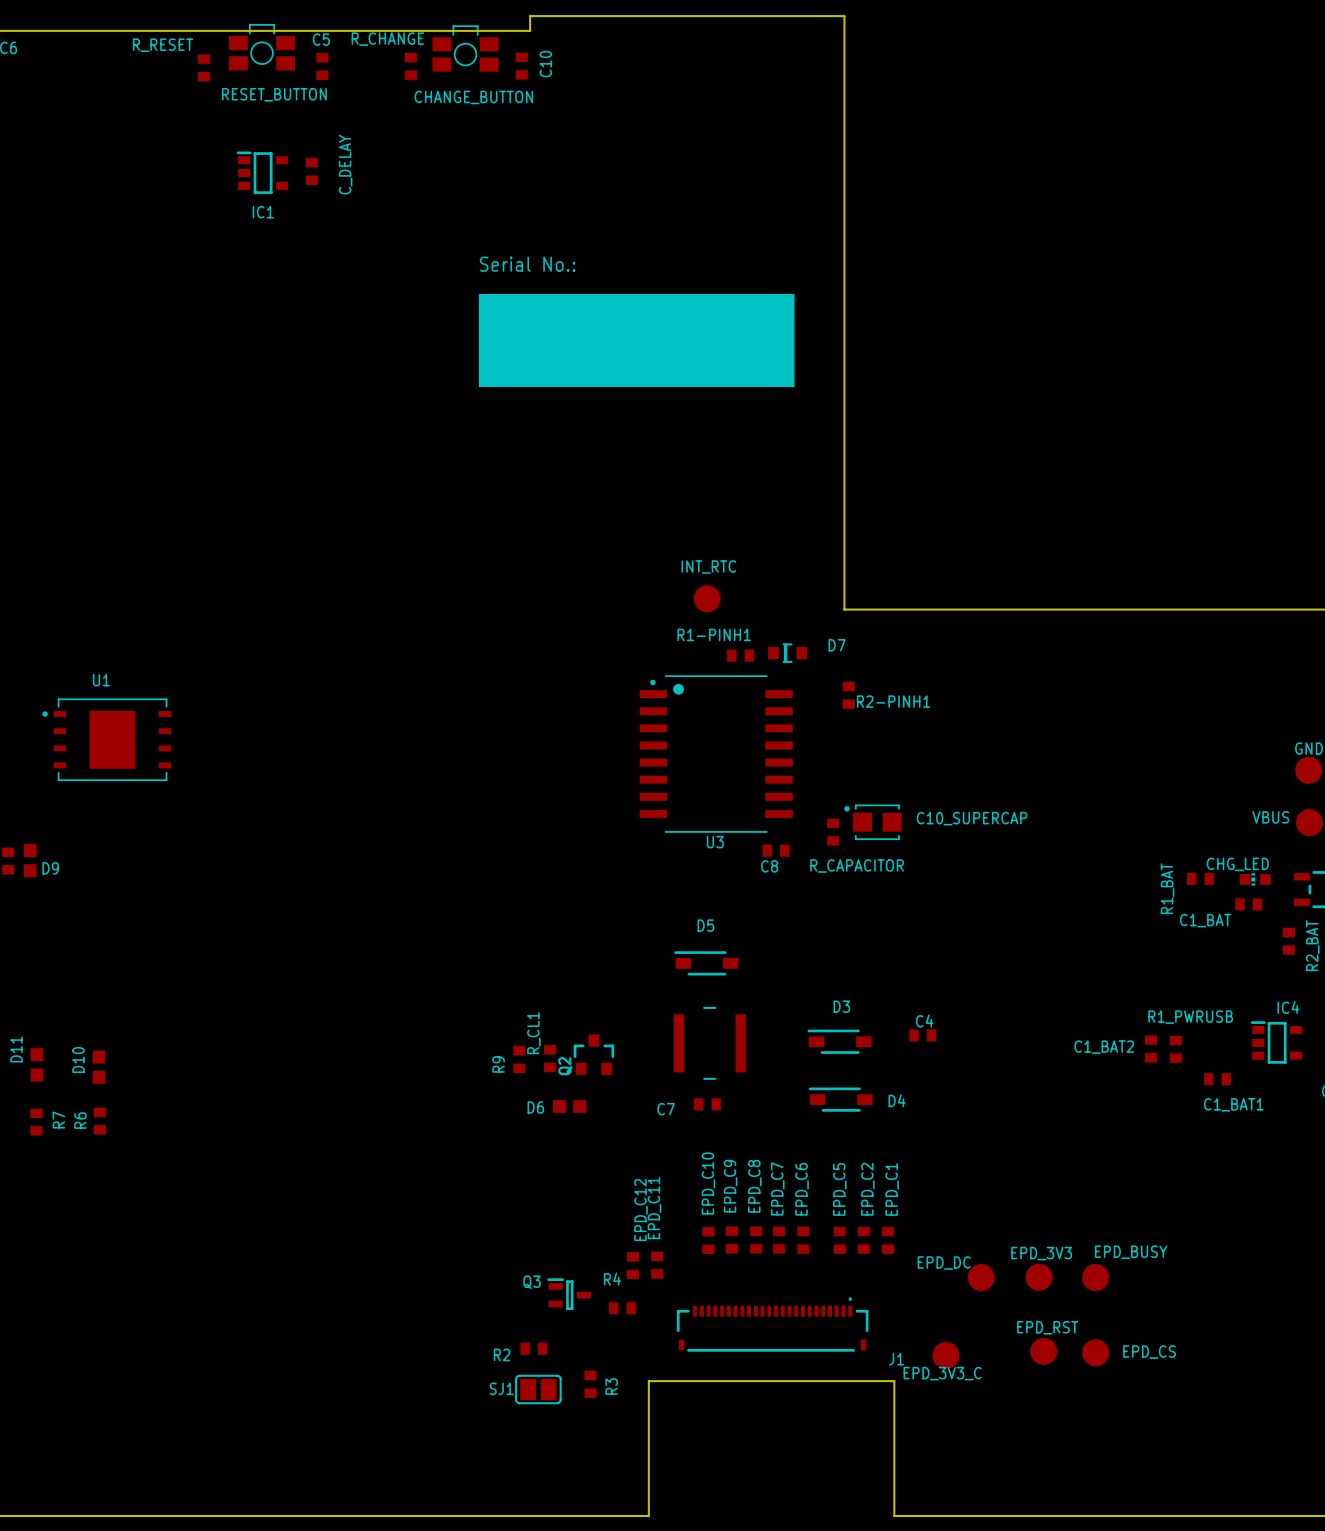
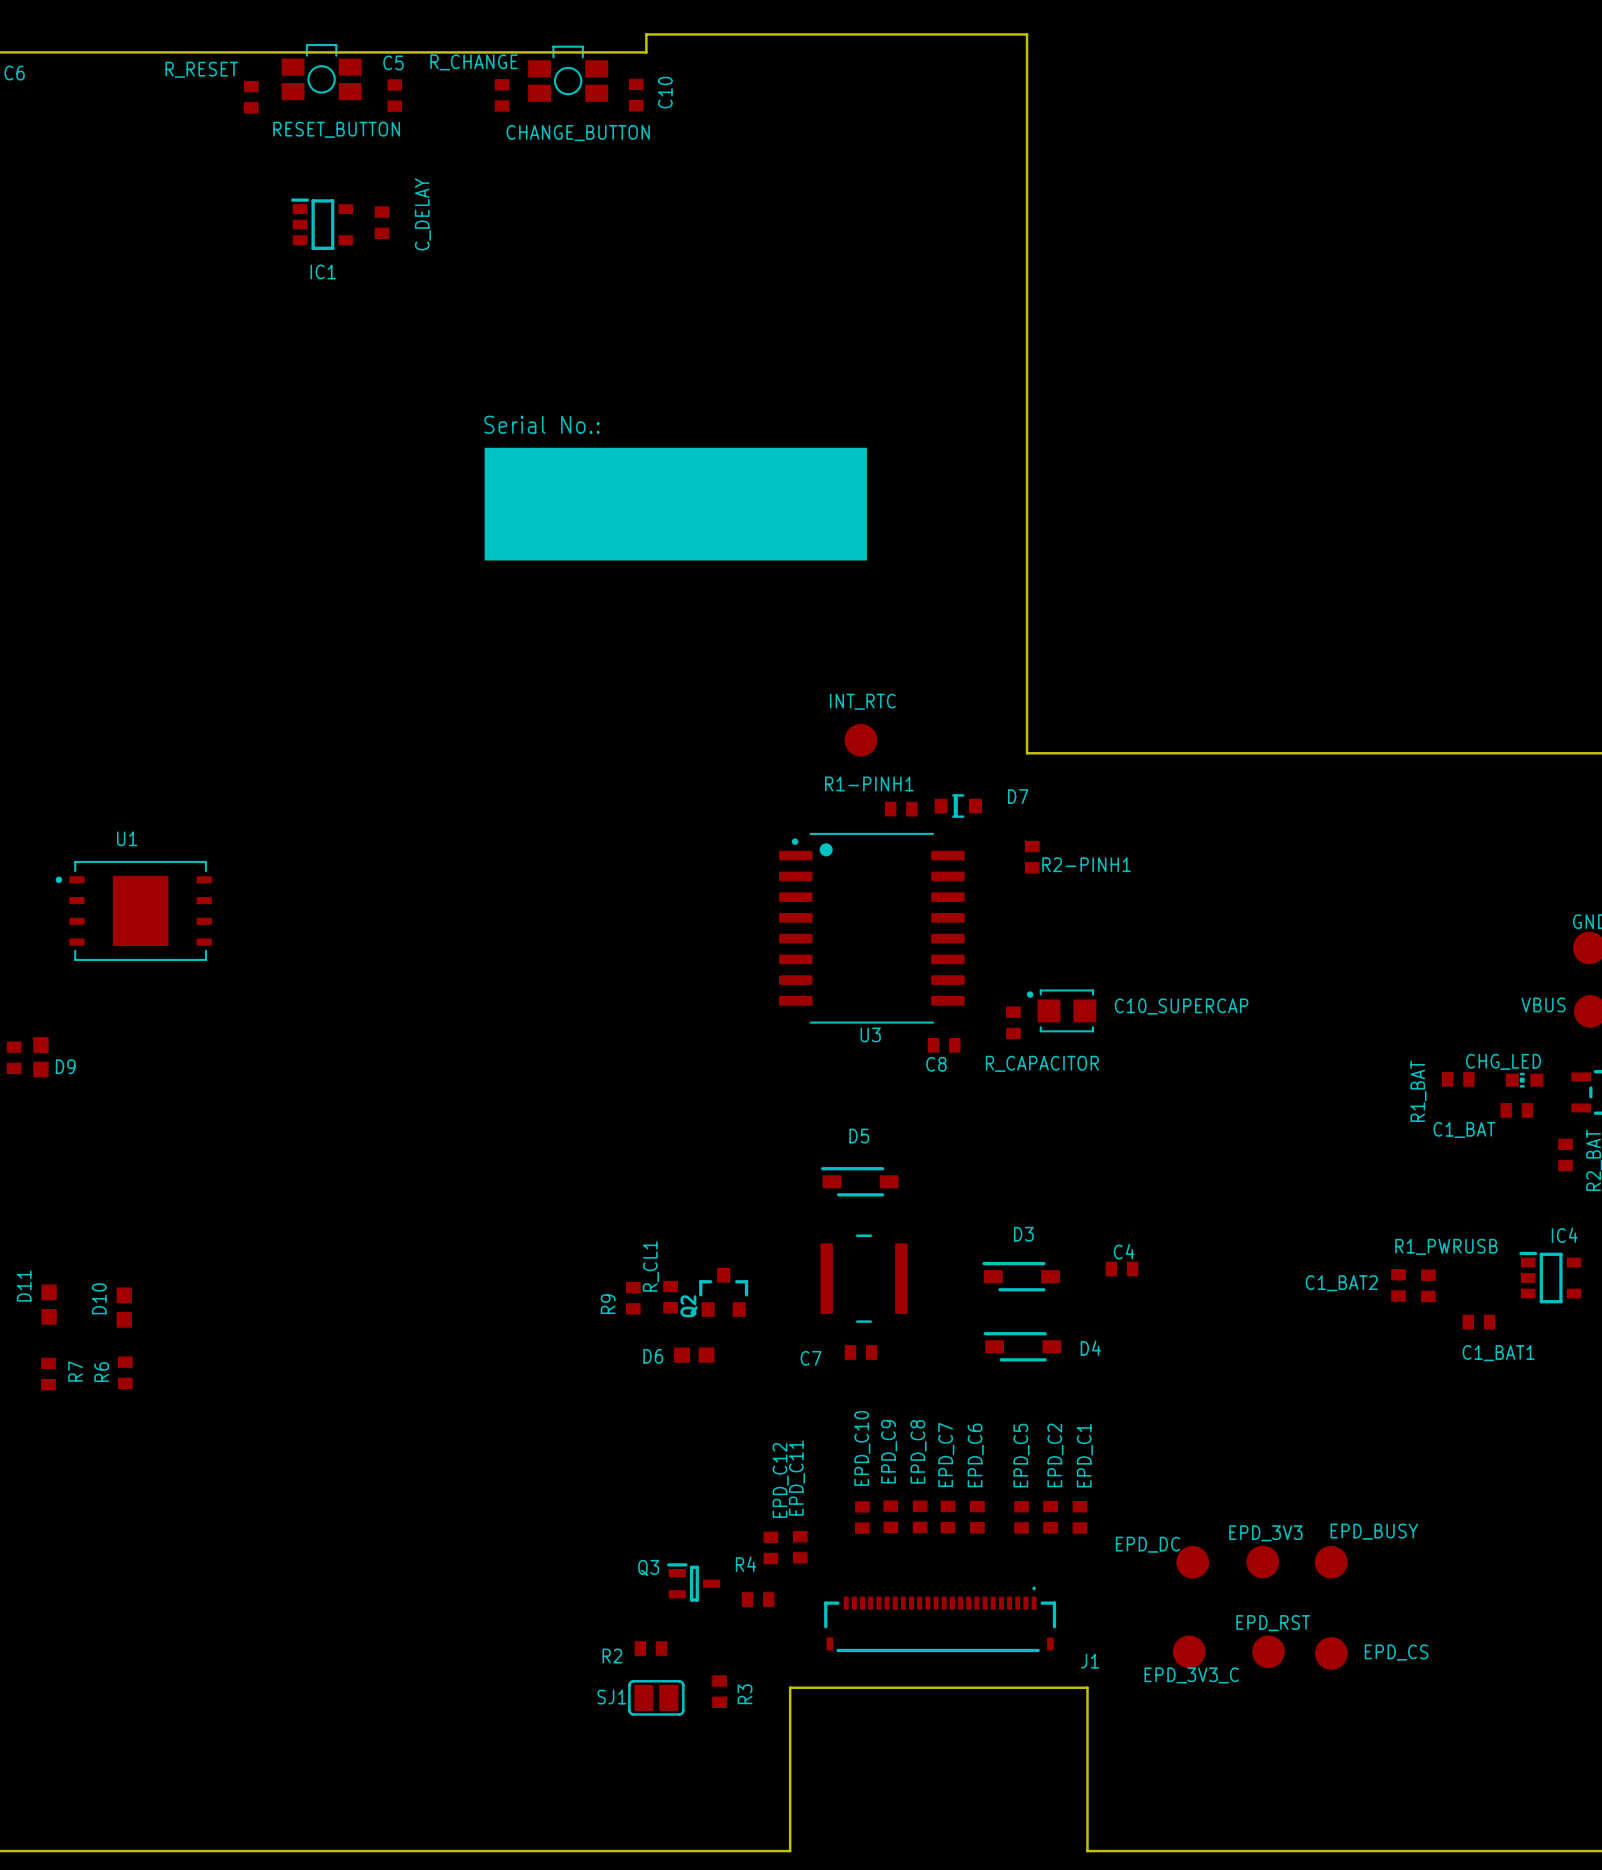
text position: Serial No.: (527, 264) -> Serial No.: (542, 424)
drawing position: (636, 340) -> (675, 504)
part position: (946, 1355) -> (1189, 1651)
text position: EPD_3V3_C (942, 1373) -> EPD_3V3_C (1191, 1675)

